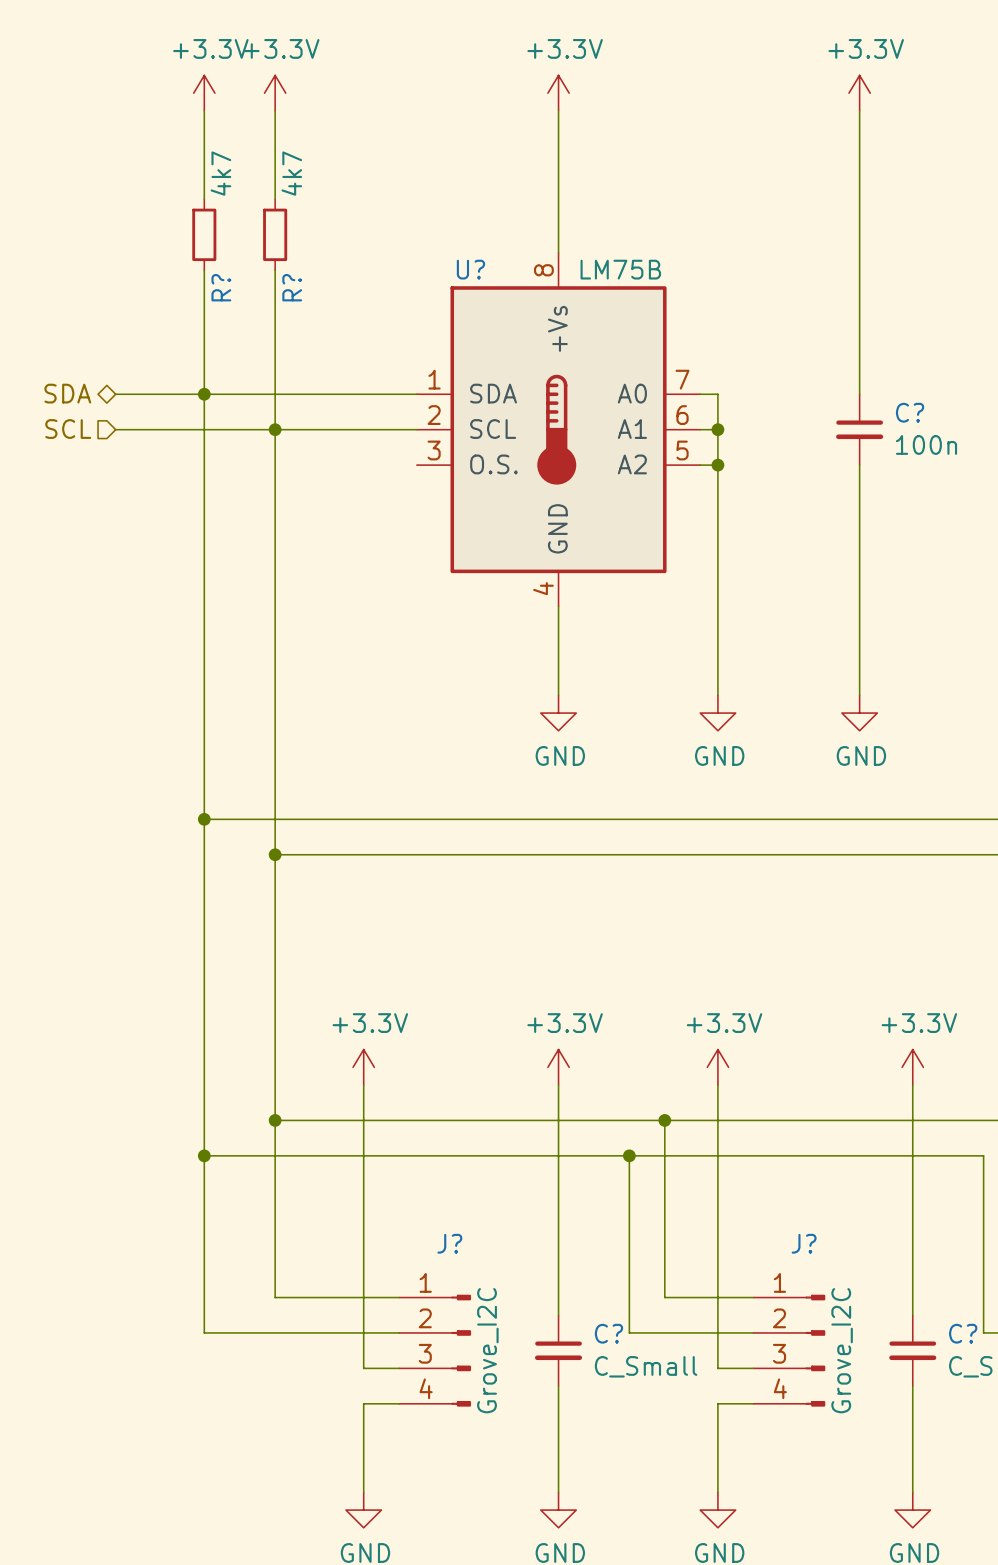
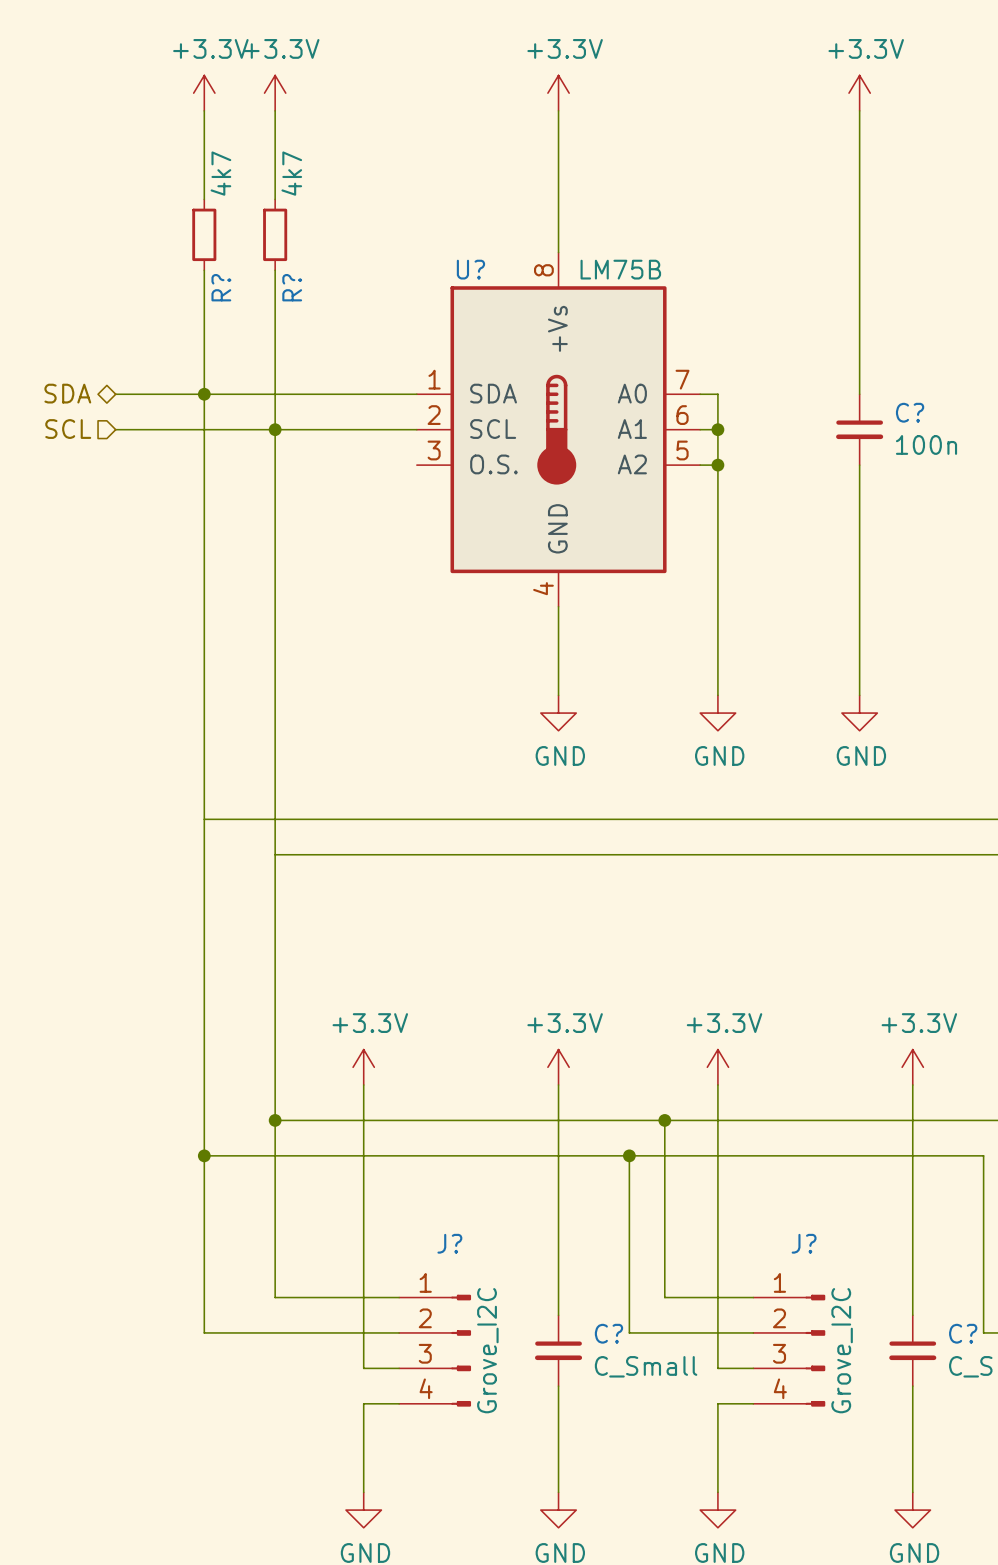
junction: (204, 819) -> none
junction: (275, 854) -> none

